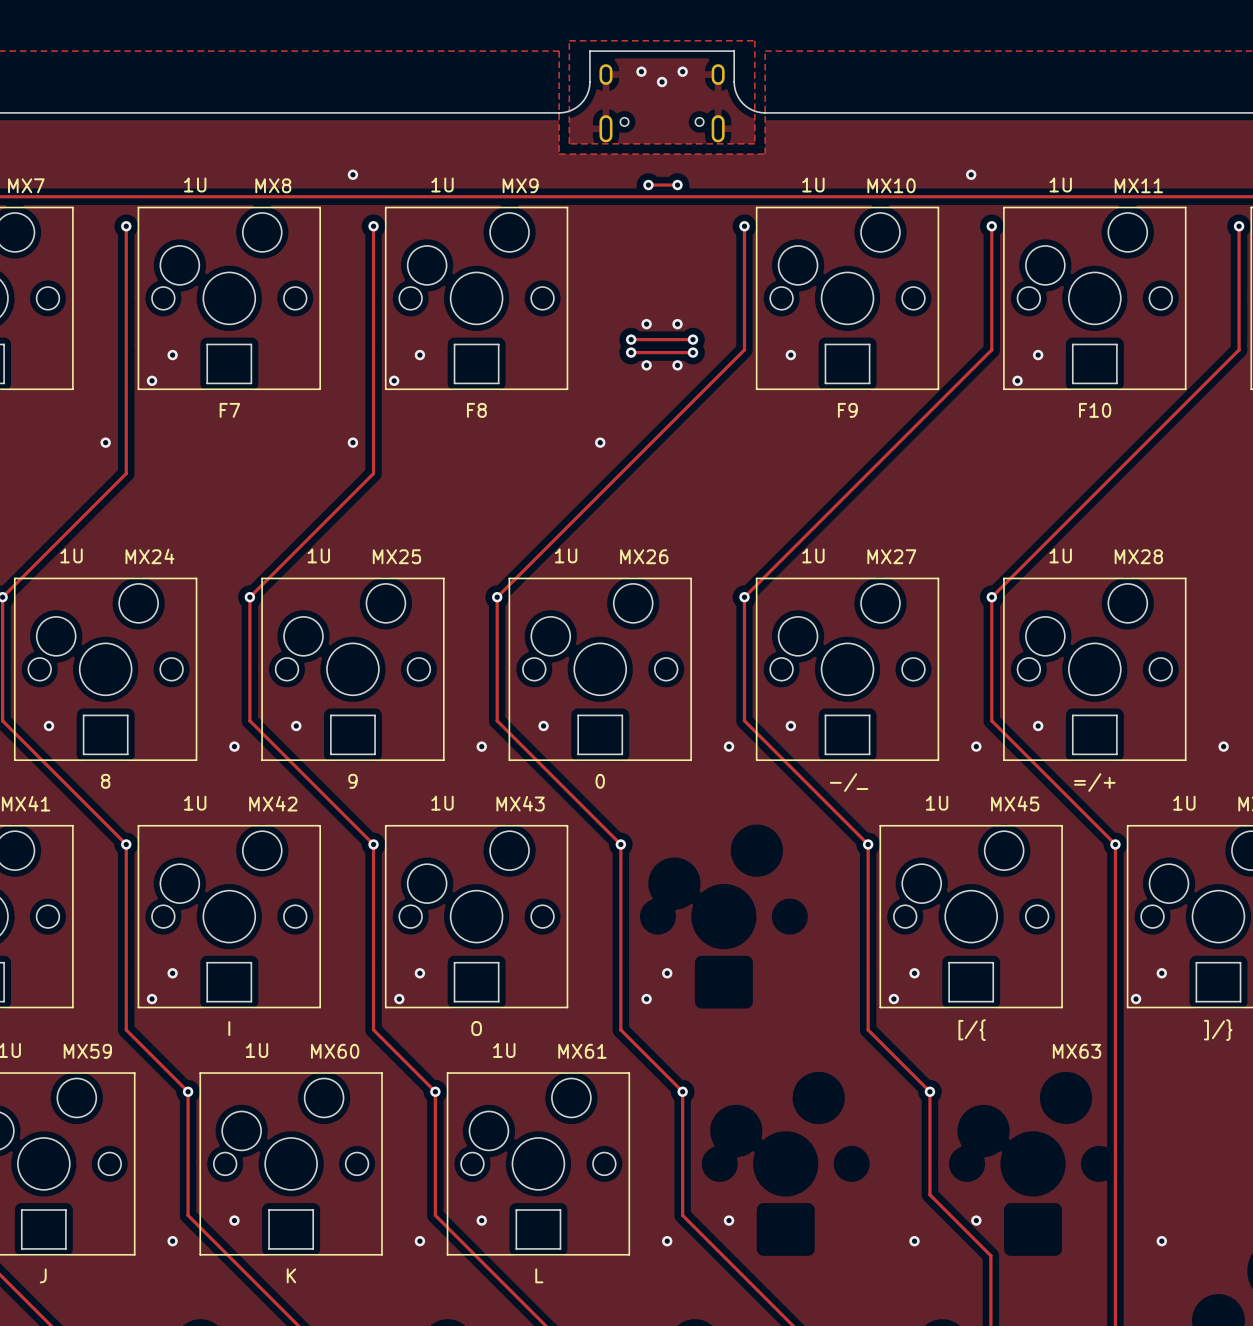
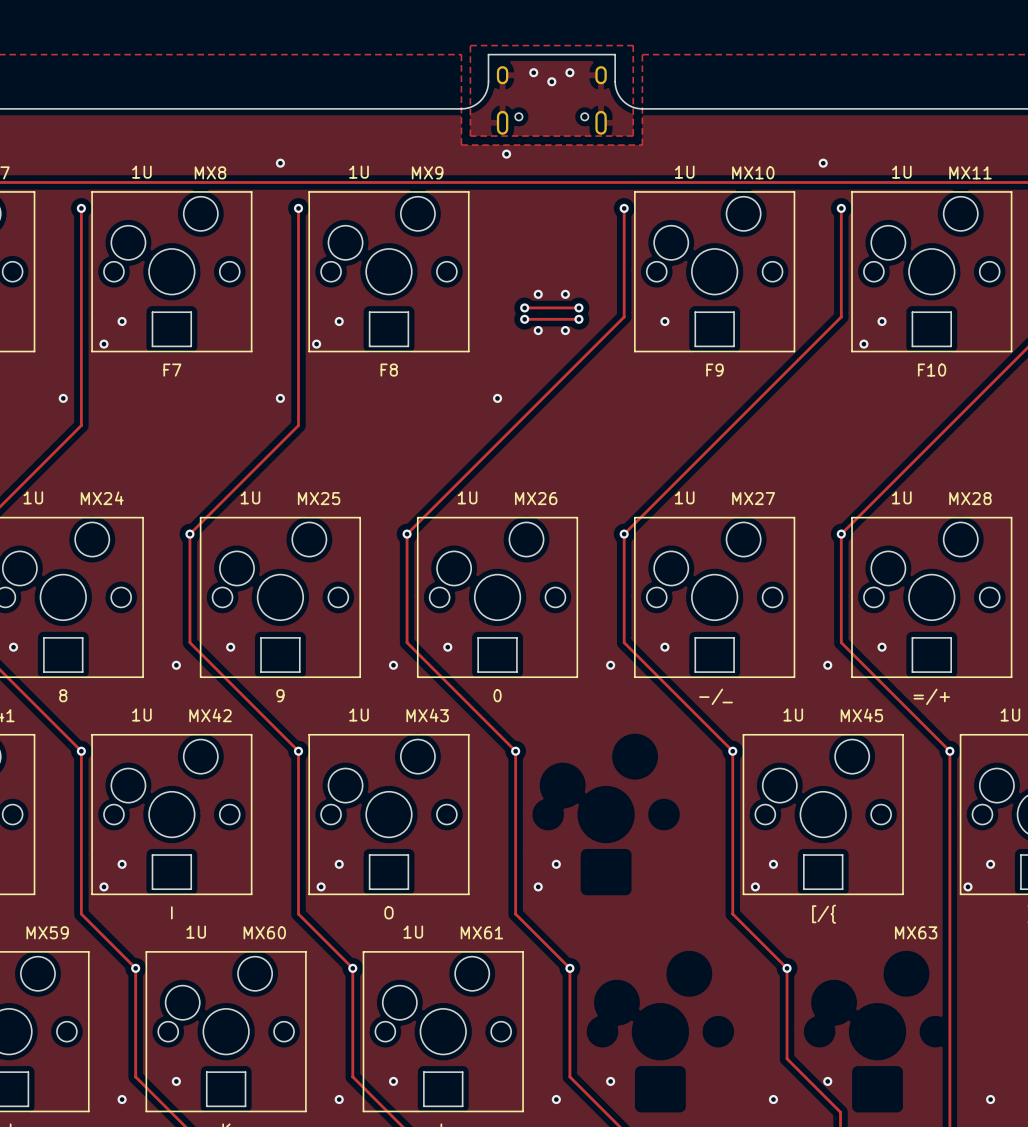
via: none -> (506, 154)
track: (648, 185) (677, 185) -> none
via: (648, 185) -> none
via: (677, 185) -> none

